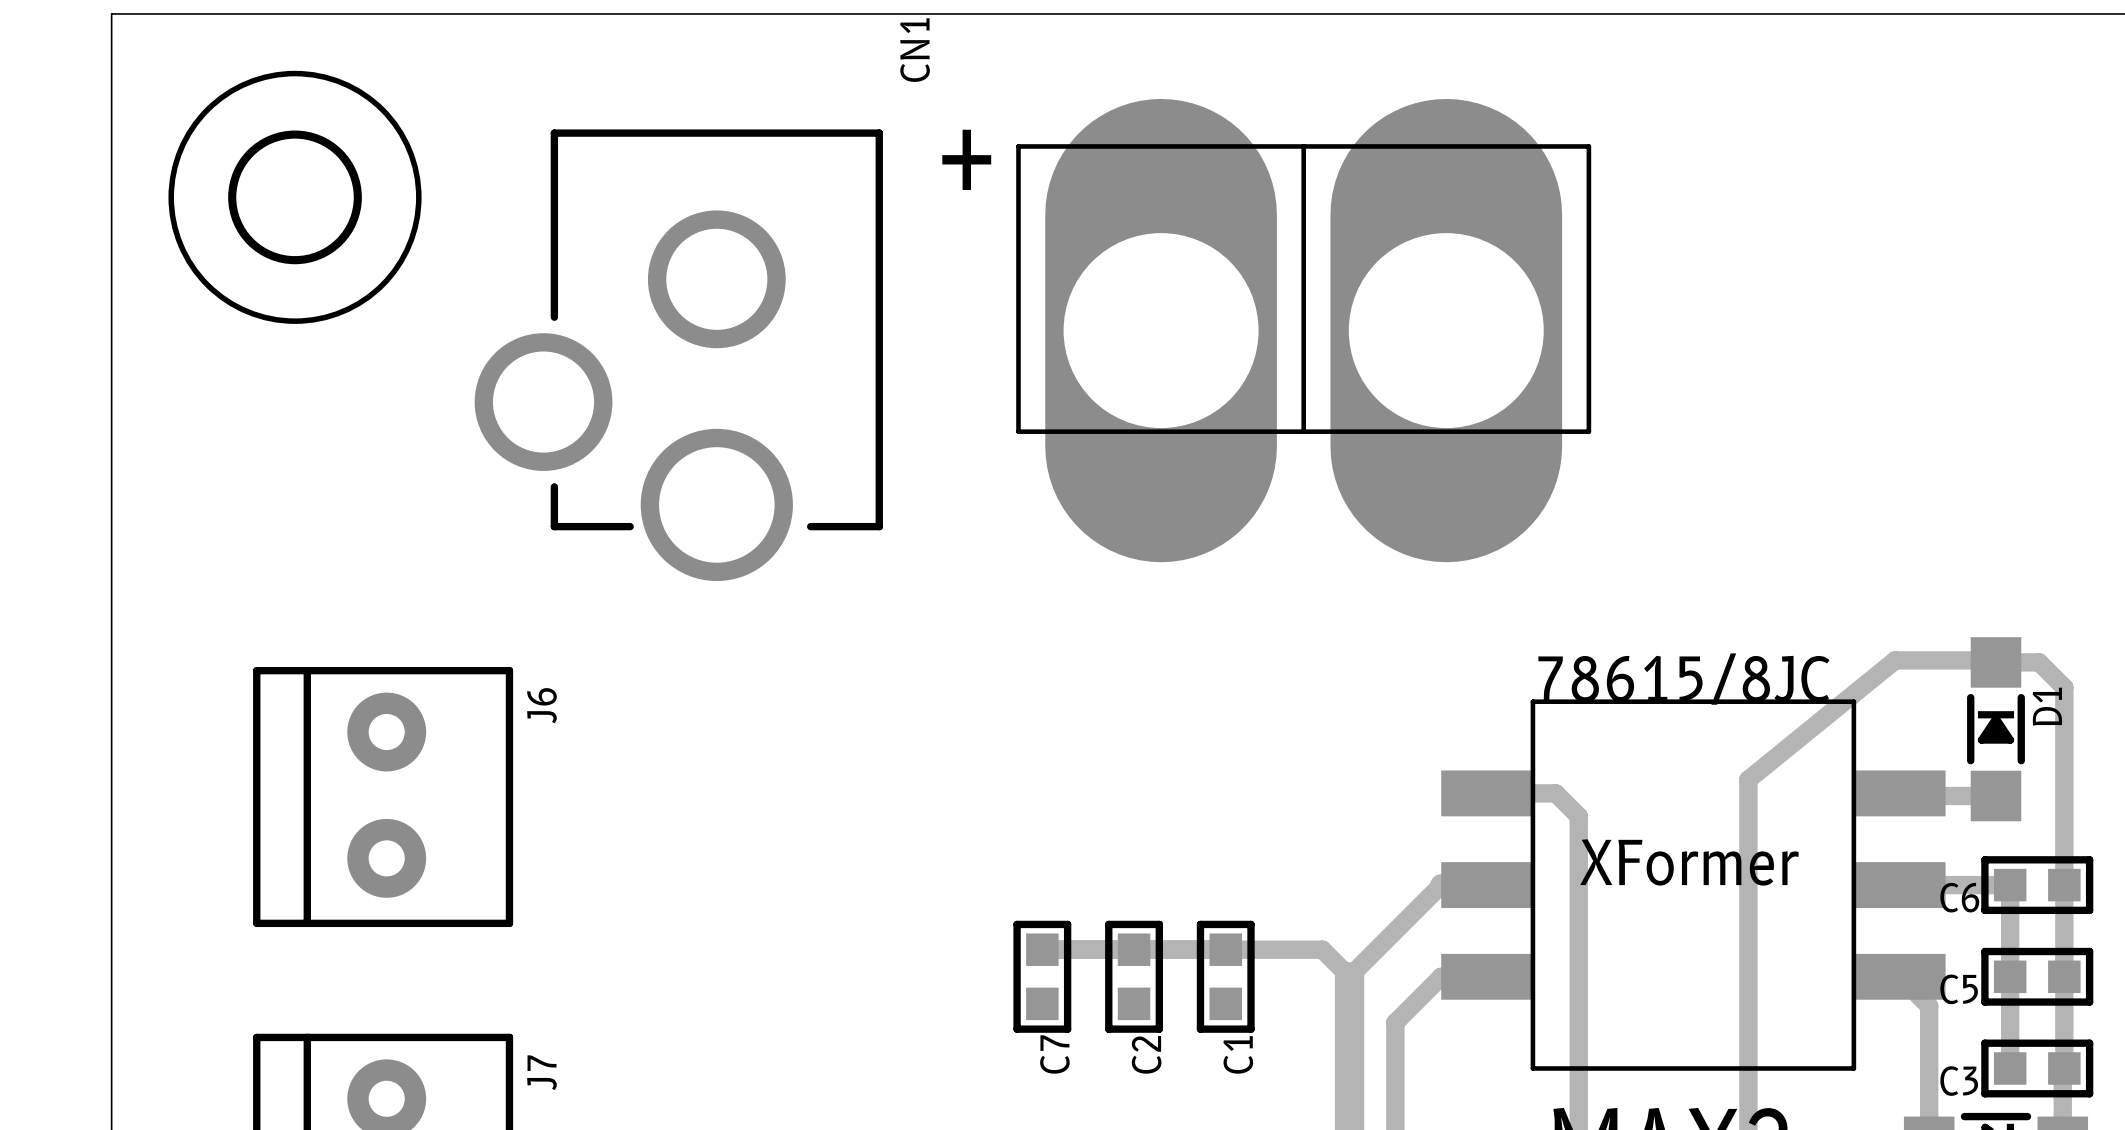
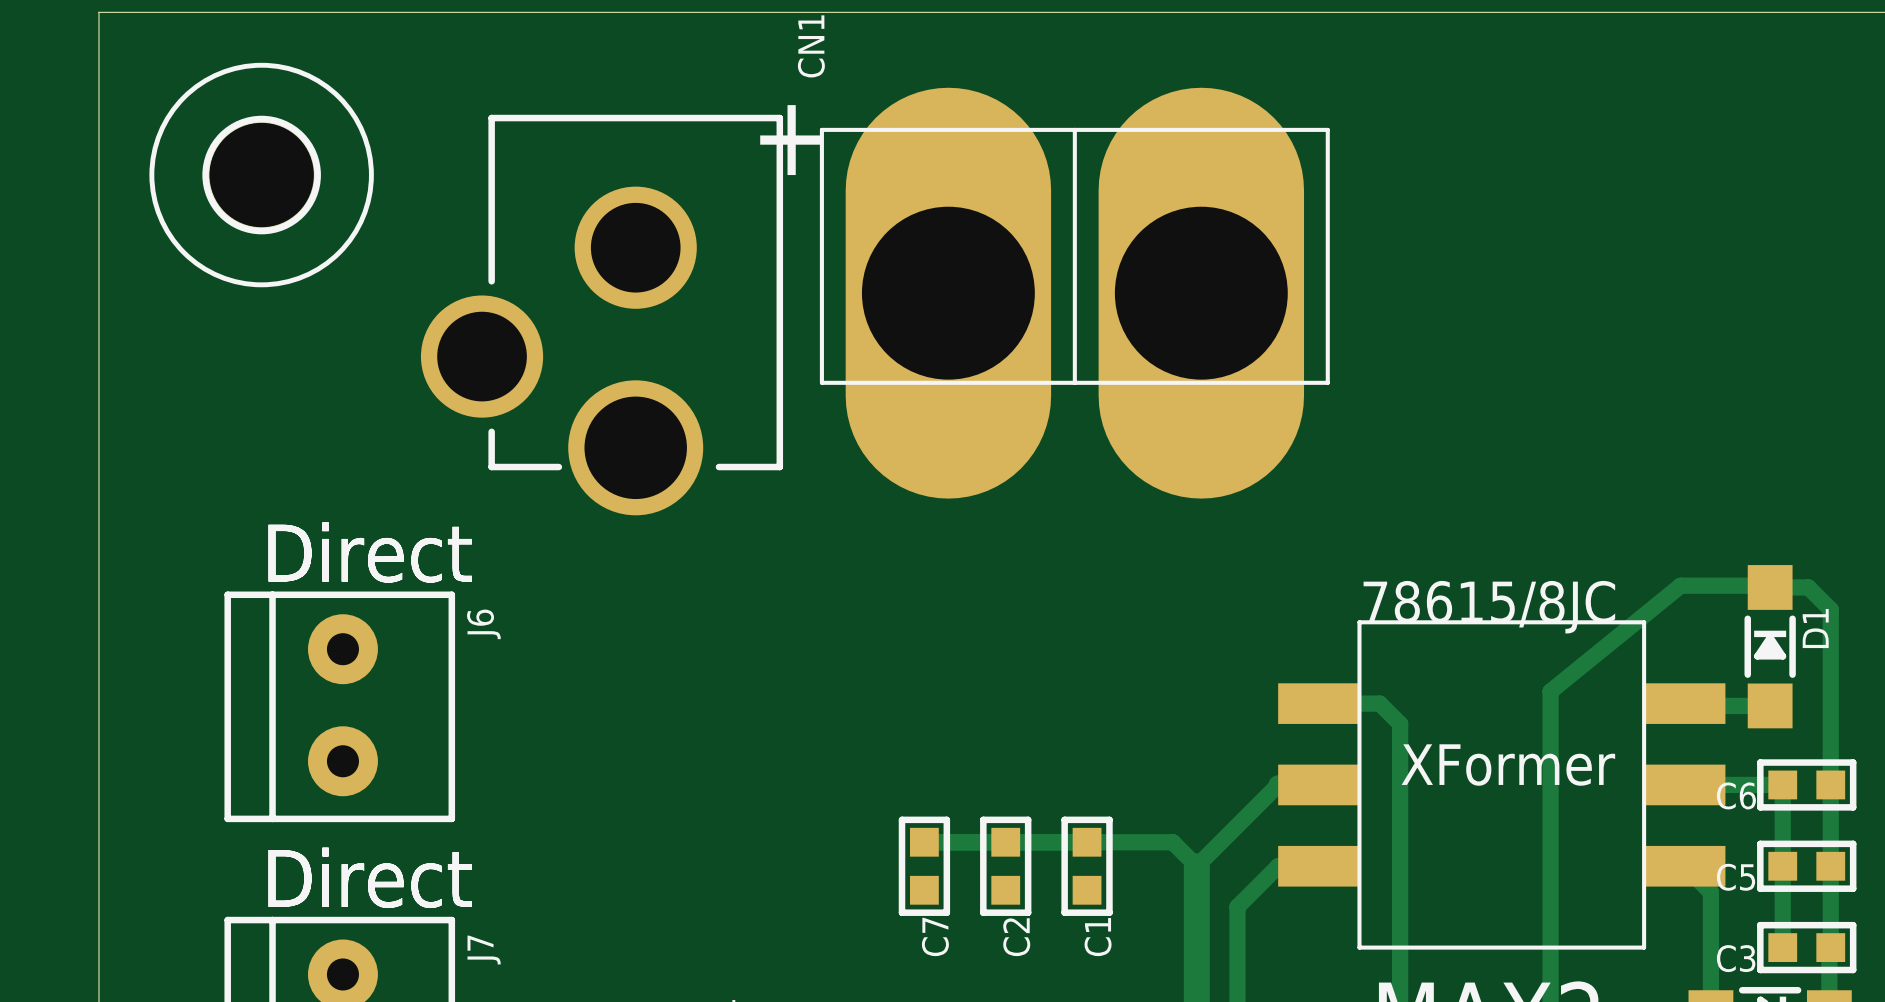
part position: (1303, 330) -> (1074, 293)
text: none -> Direct (370, 552)
text: none -> Direct (370, 877)

